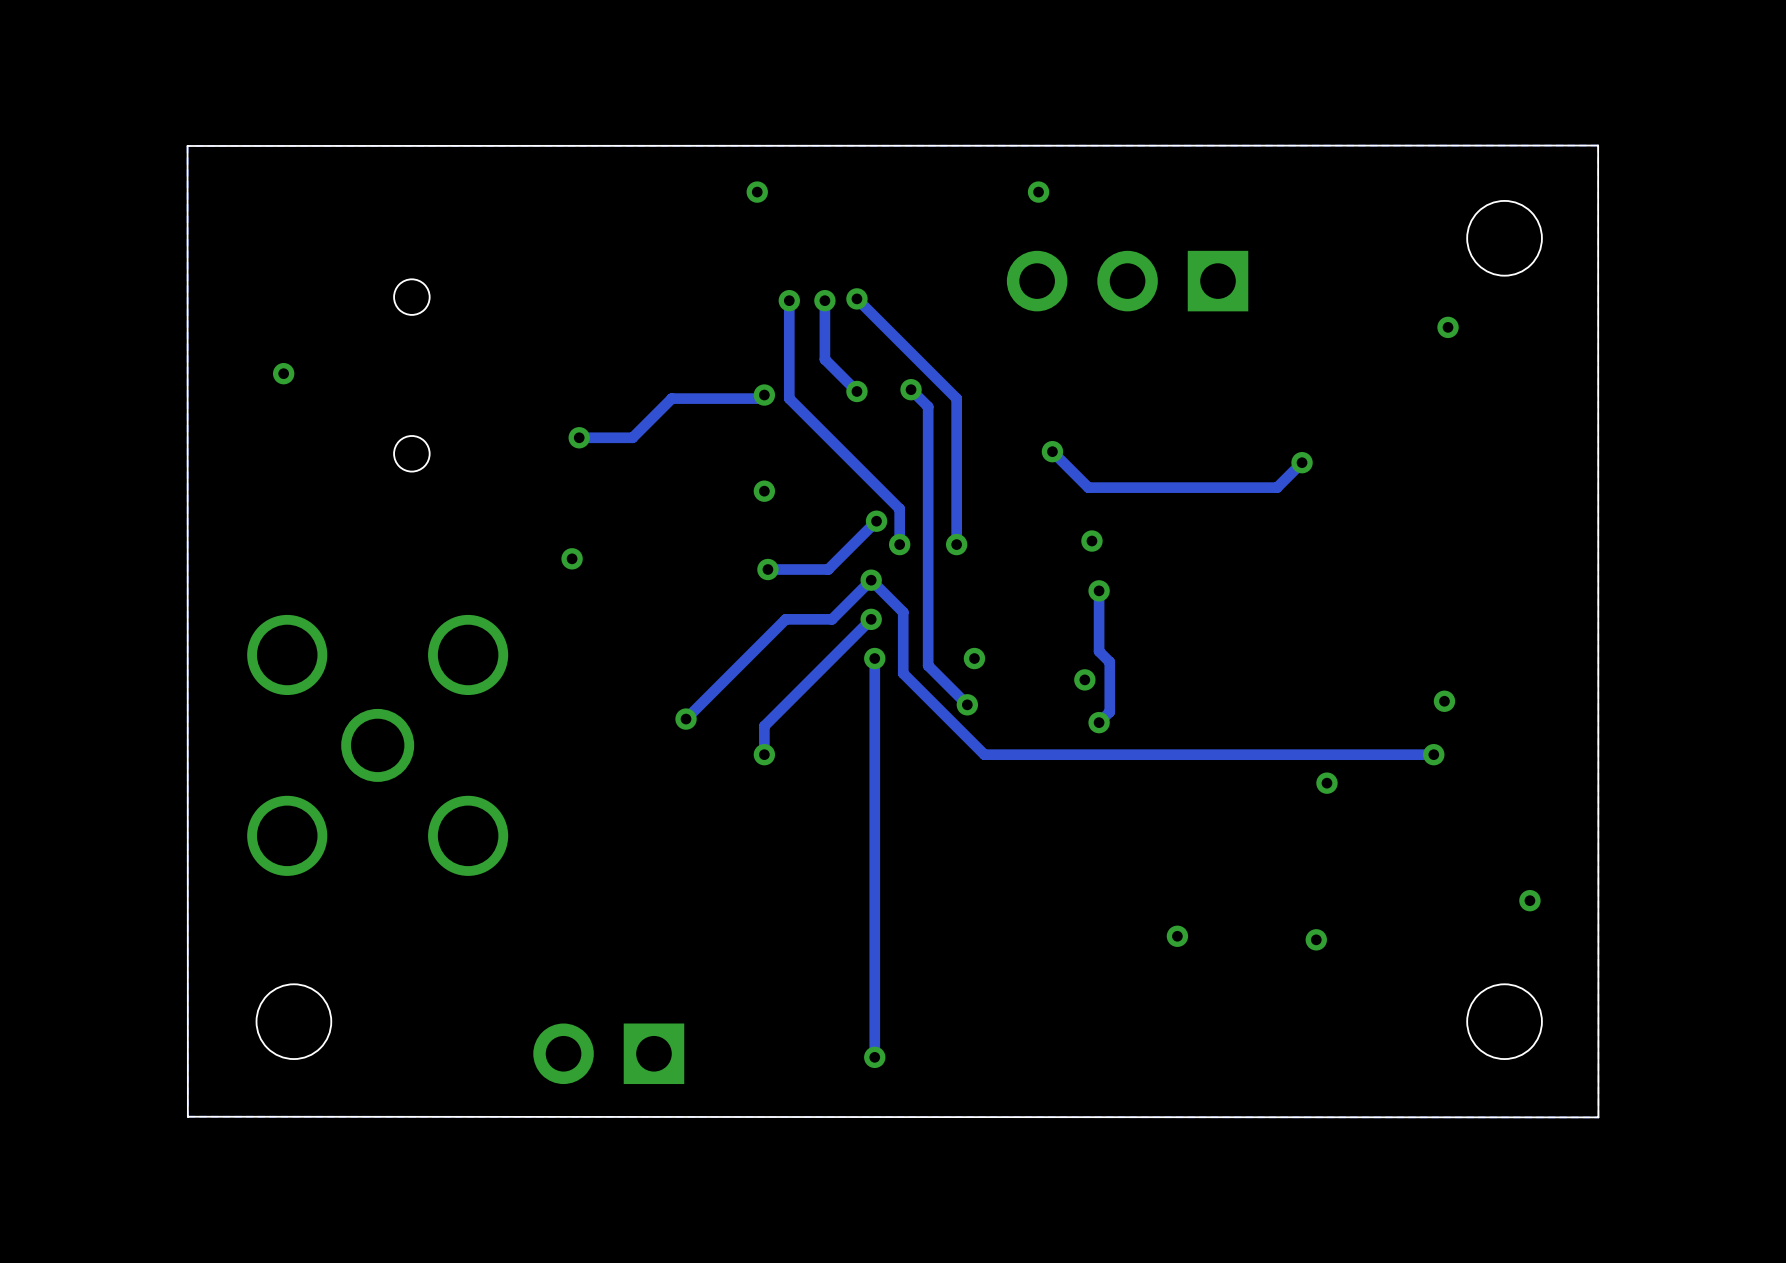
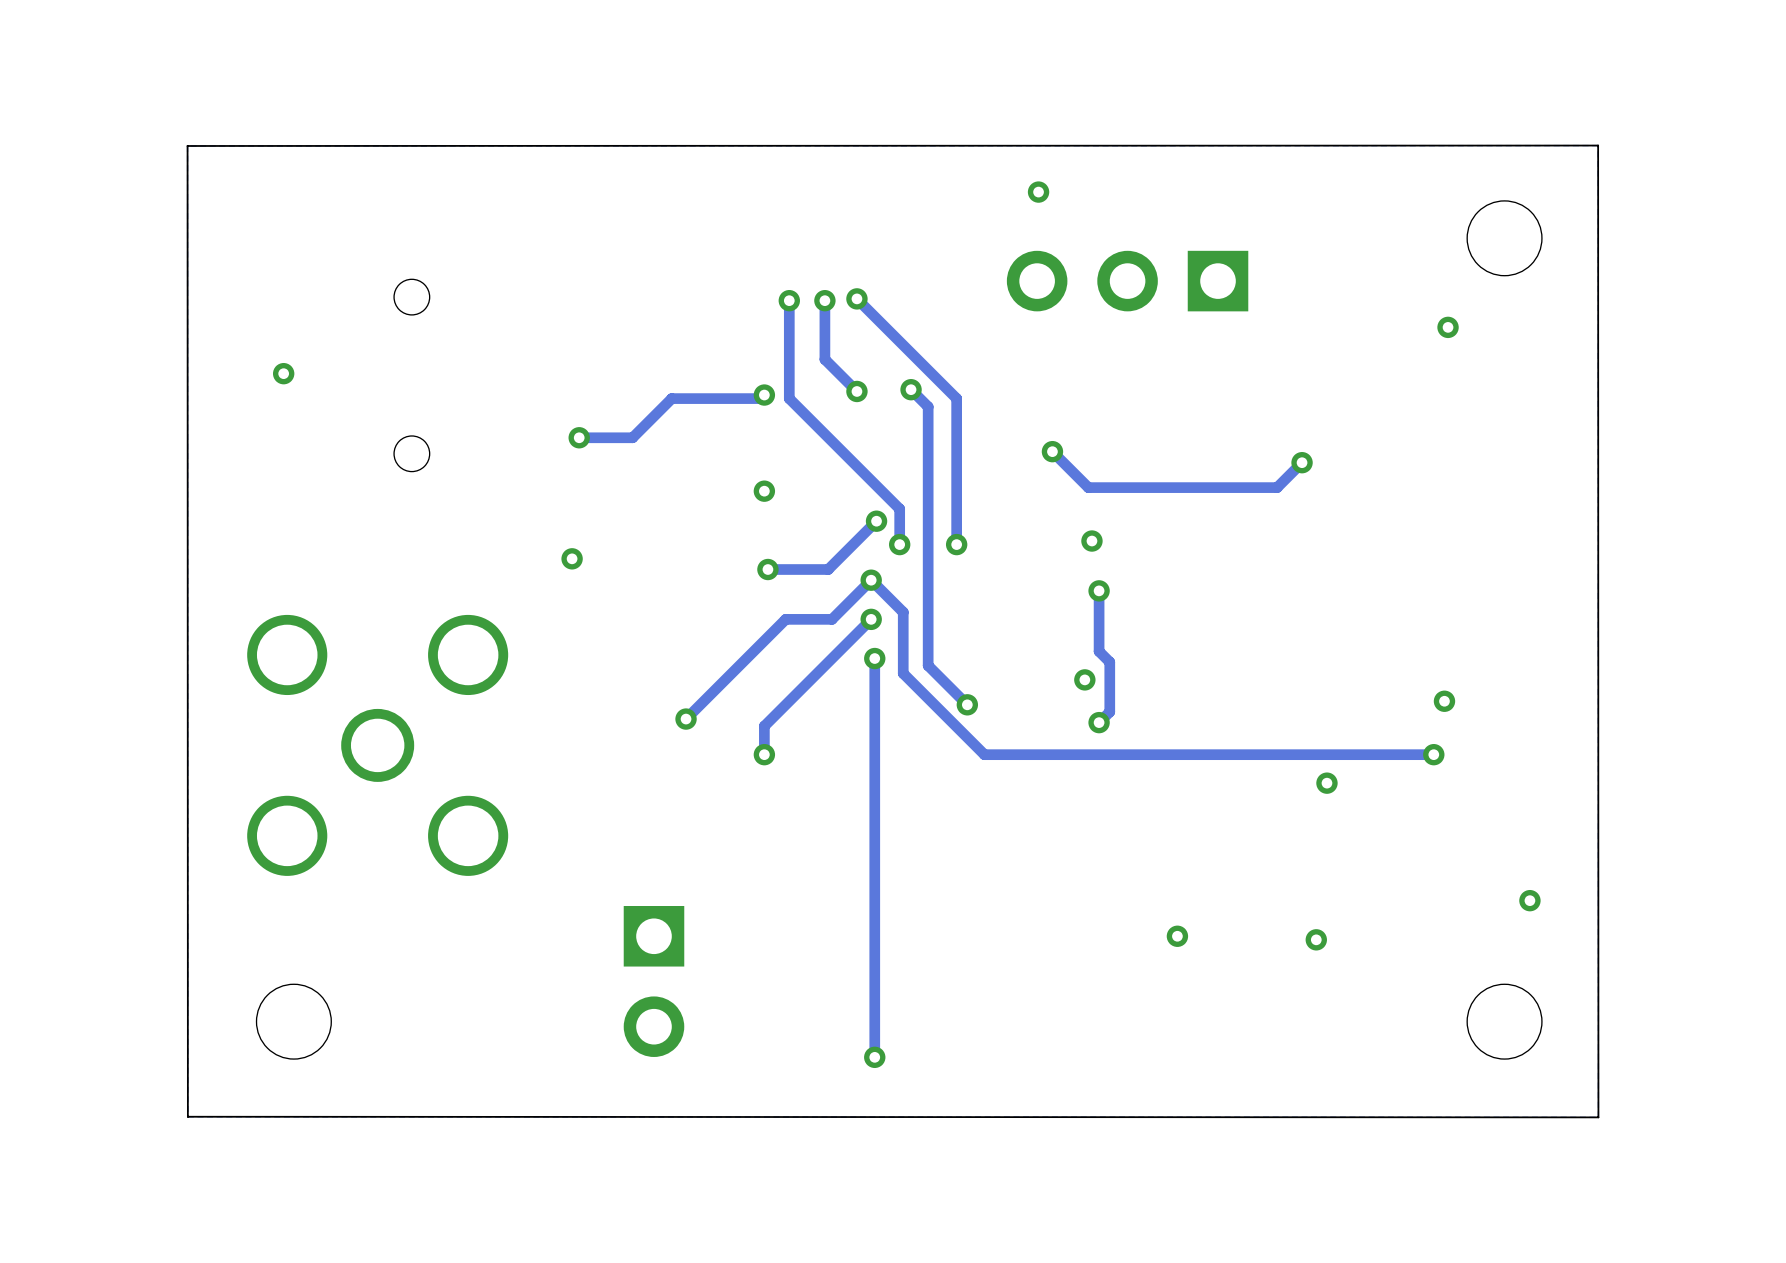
via: (757, 192) -> none
via: (974, 658) -> none
part rotation: 0° (608, 1053) -> 90° counterclockwise (653, 981)

